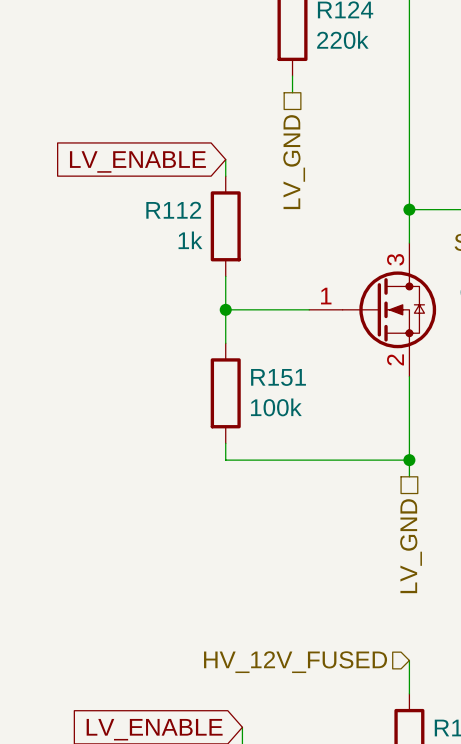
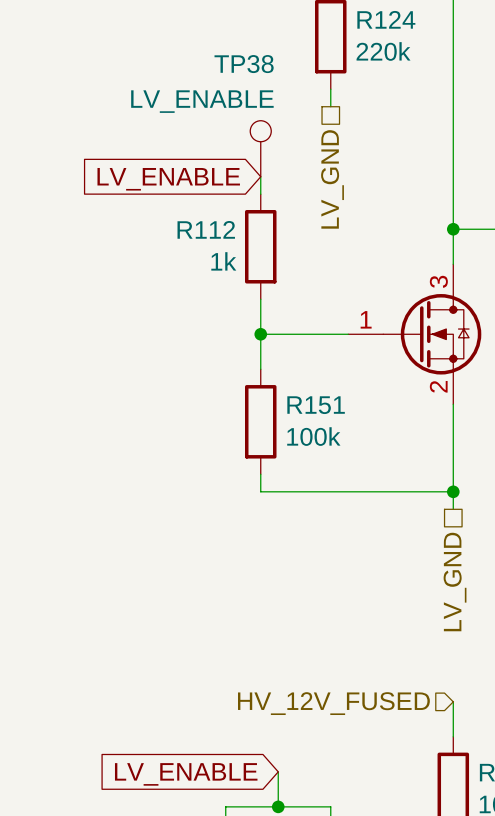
TP38: none -> LV_ENABLE (260, 148)

